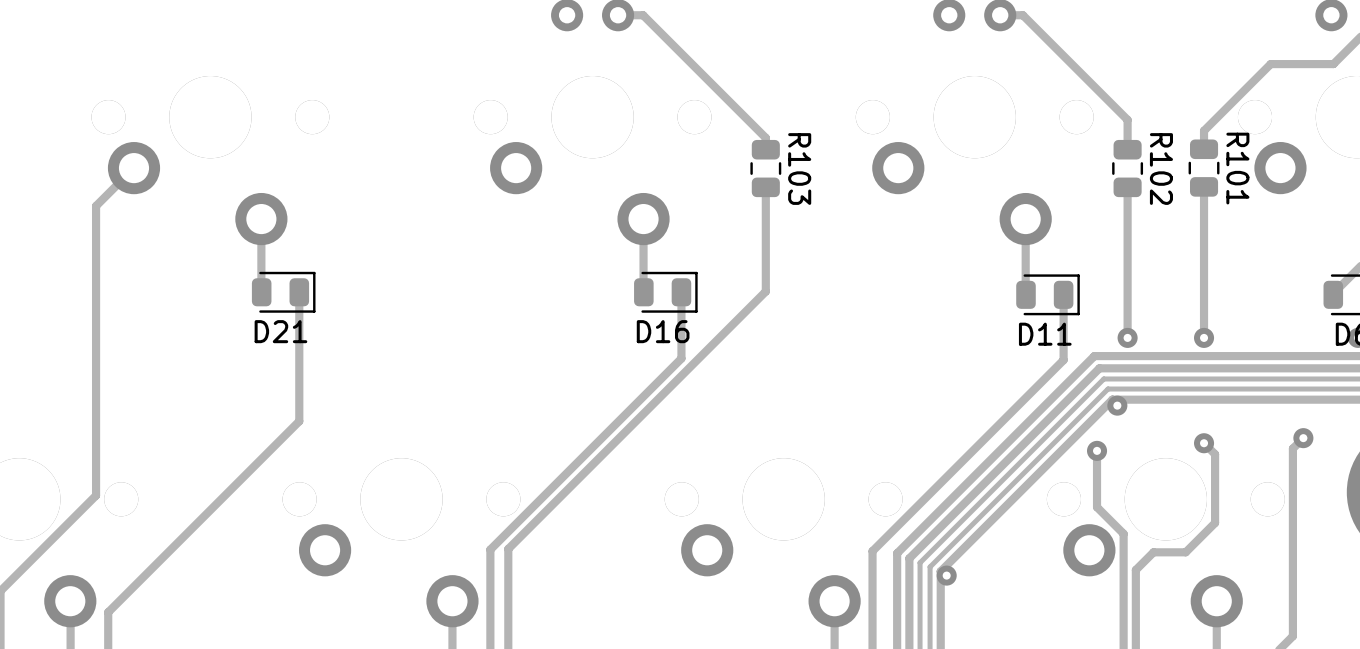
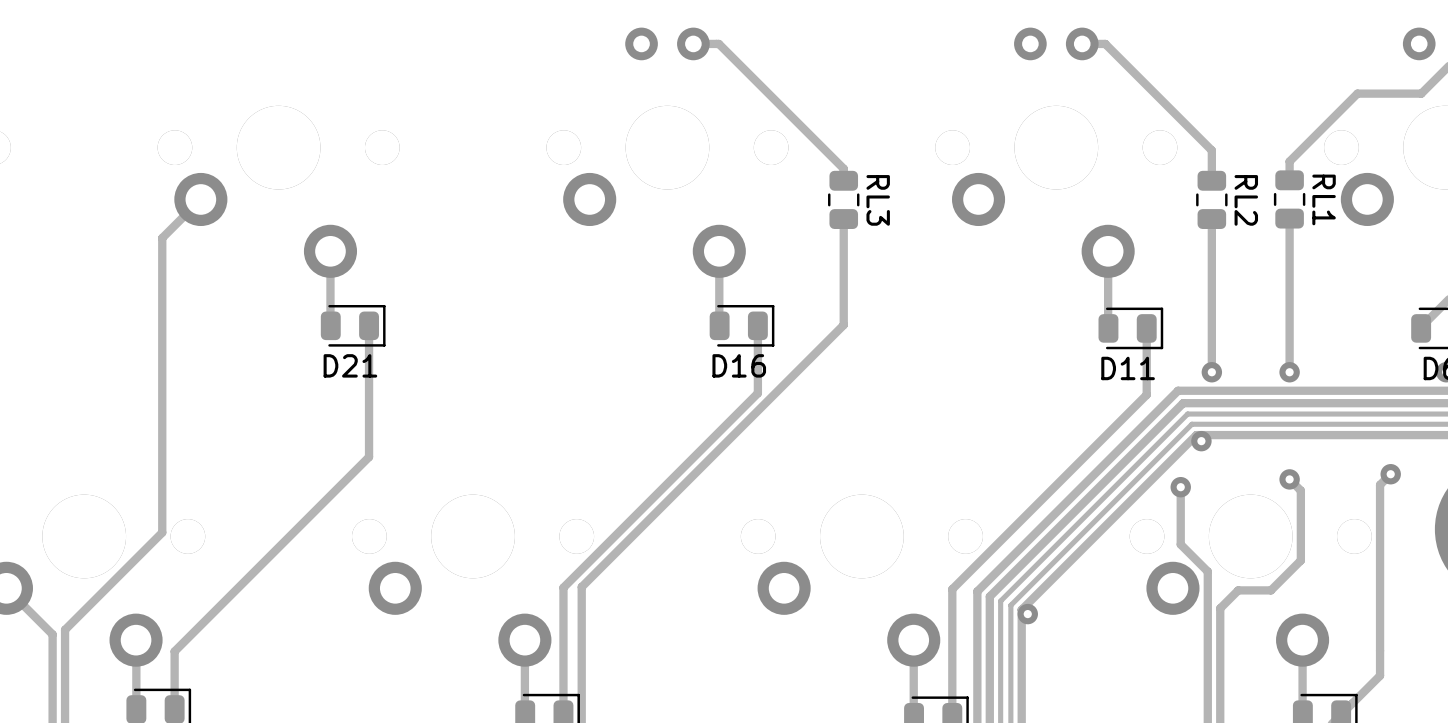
R101 name: R101 (1237, 168) -> RL1 (1324, 199)
R103 name: R103 (799, 169) -> RL3 (878, 200)
R102 name: R102 (1161, 169) -> RL2 (1246, 200)

